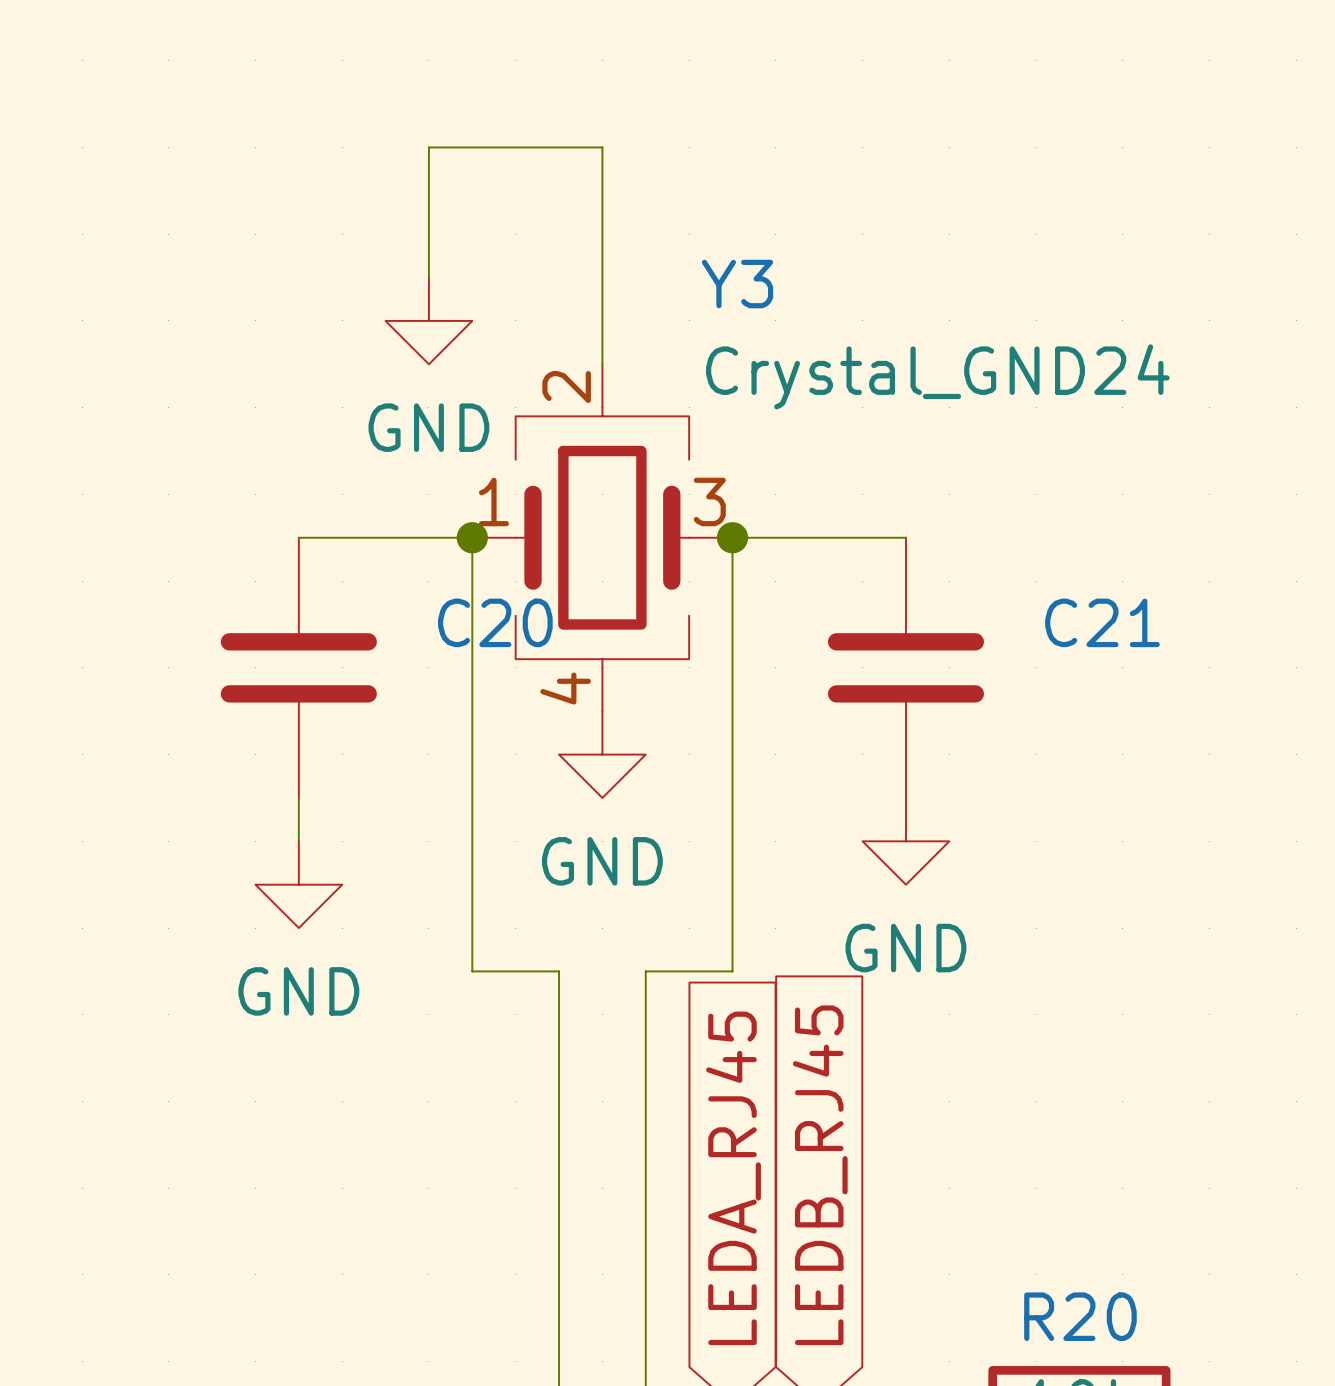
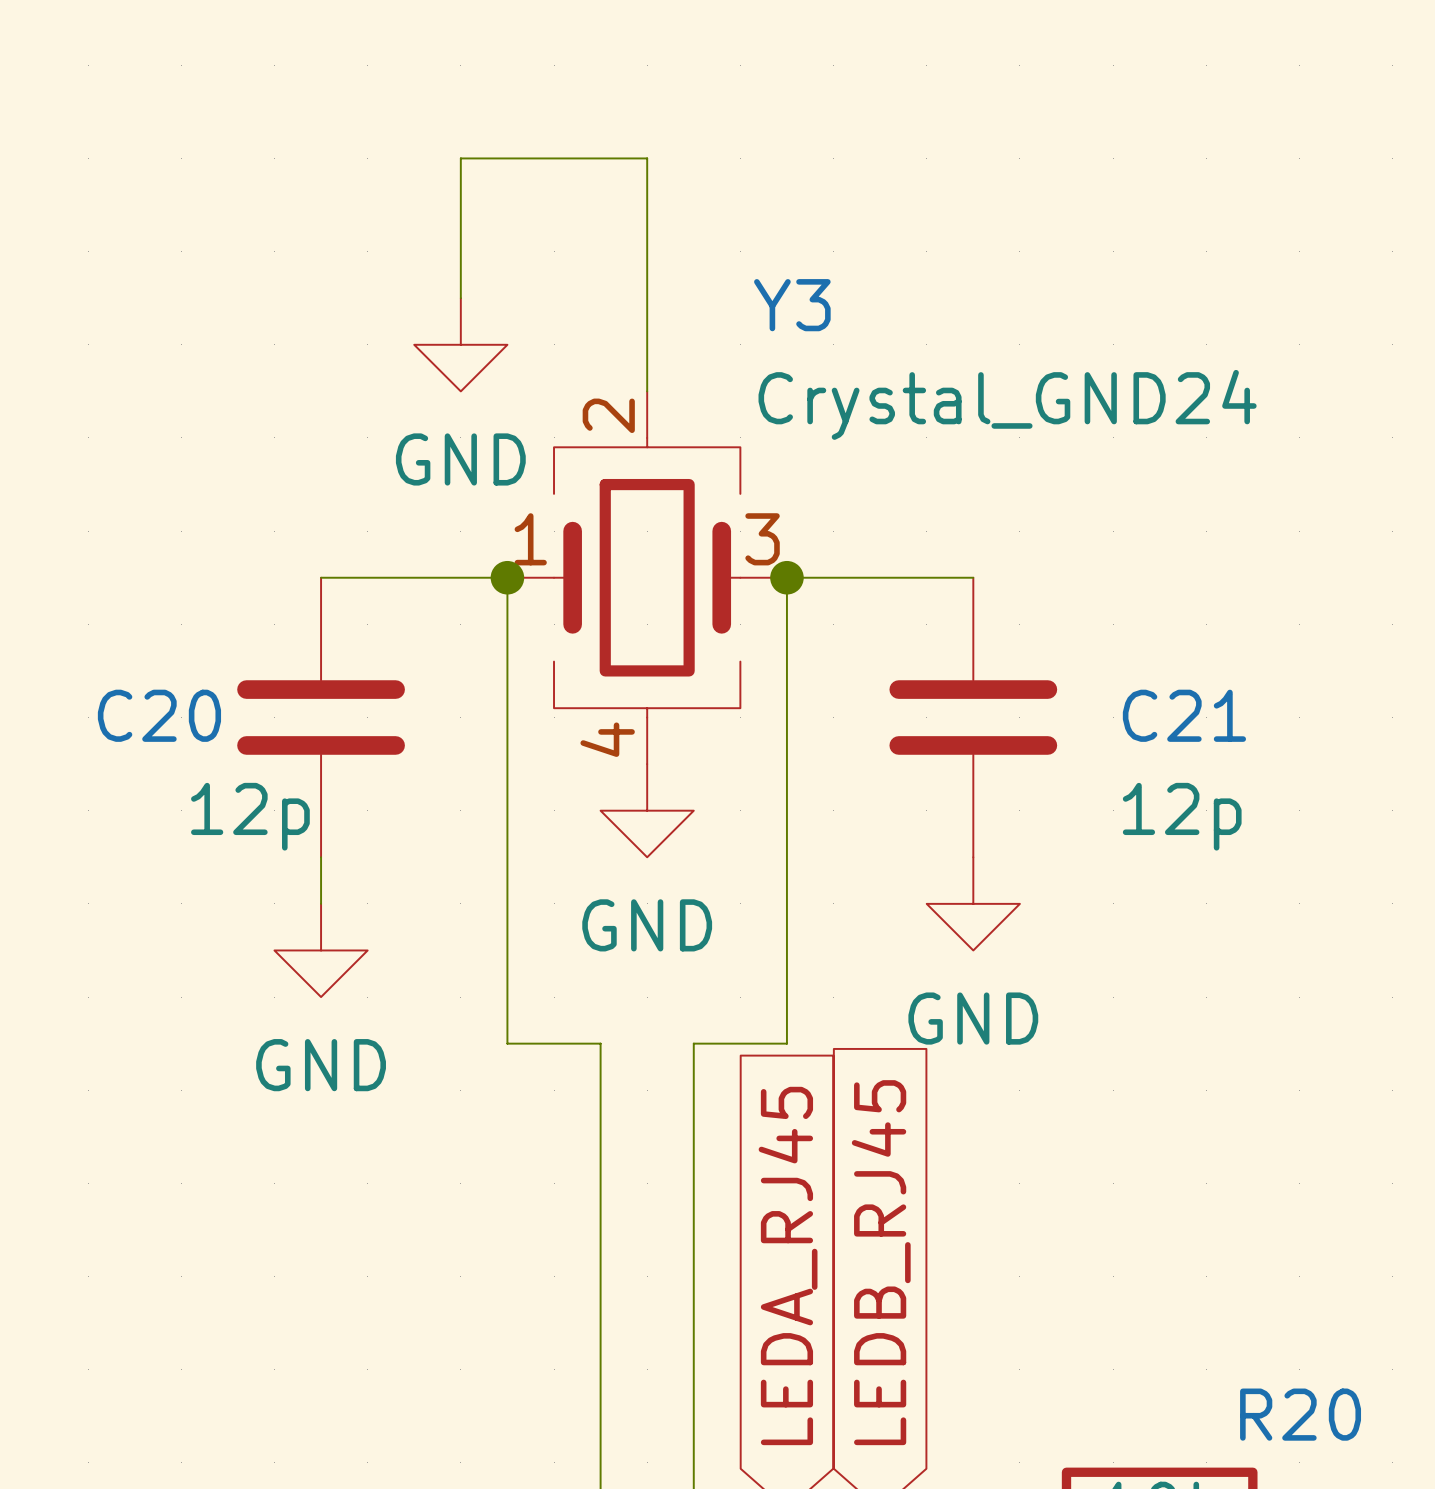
C20 name position: C20 (495, 622) -> C20 (159, 715)
C21 name position: C21 (1102, 622) -> C21 (1184, 715)
C20 value: none -> 12p (250, 816)
C21 value: none -> 12p (1182, 816)
R20 name position: R20 (1080, 1316) -> R20 (1300, 1414)

